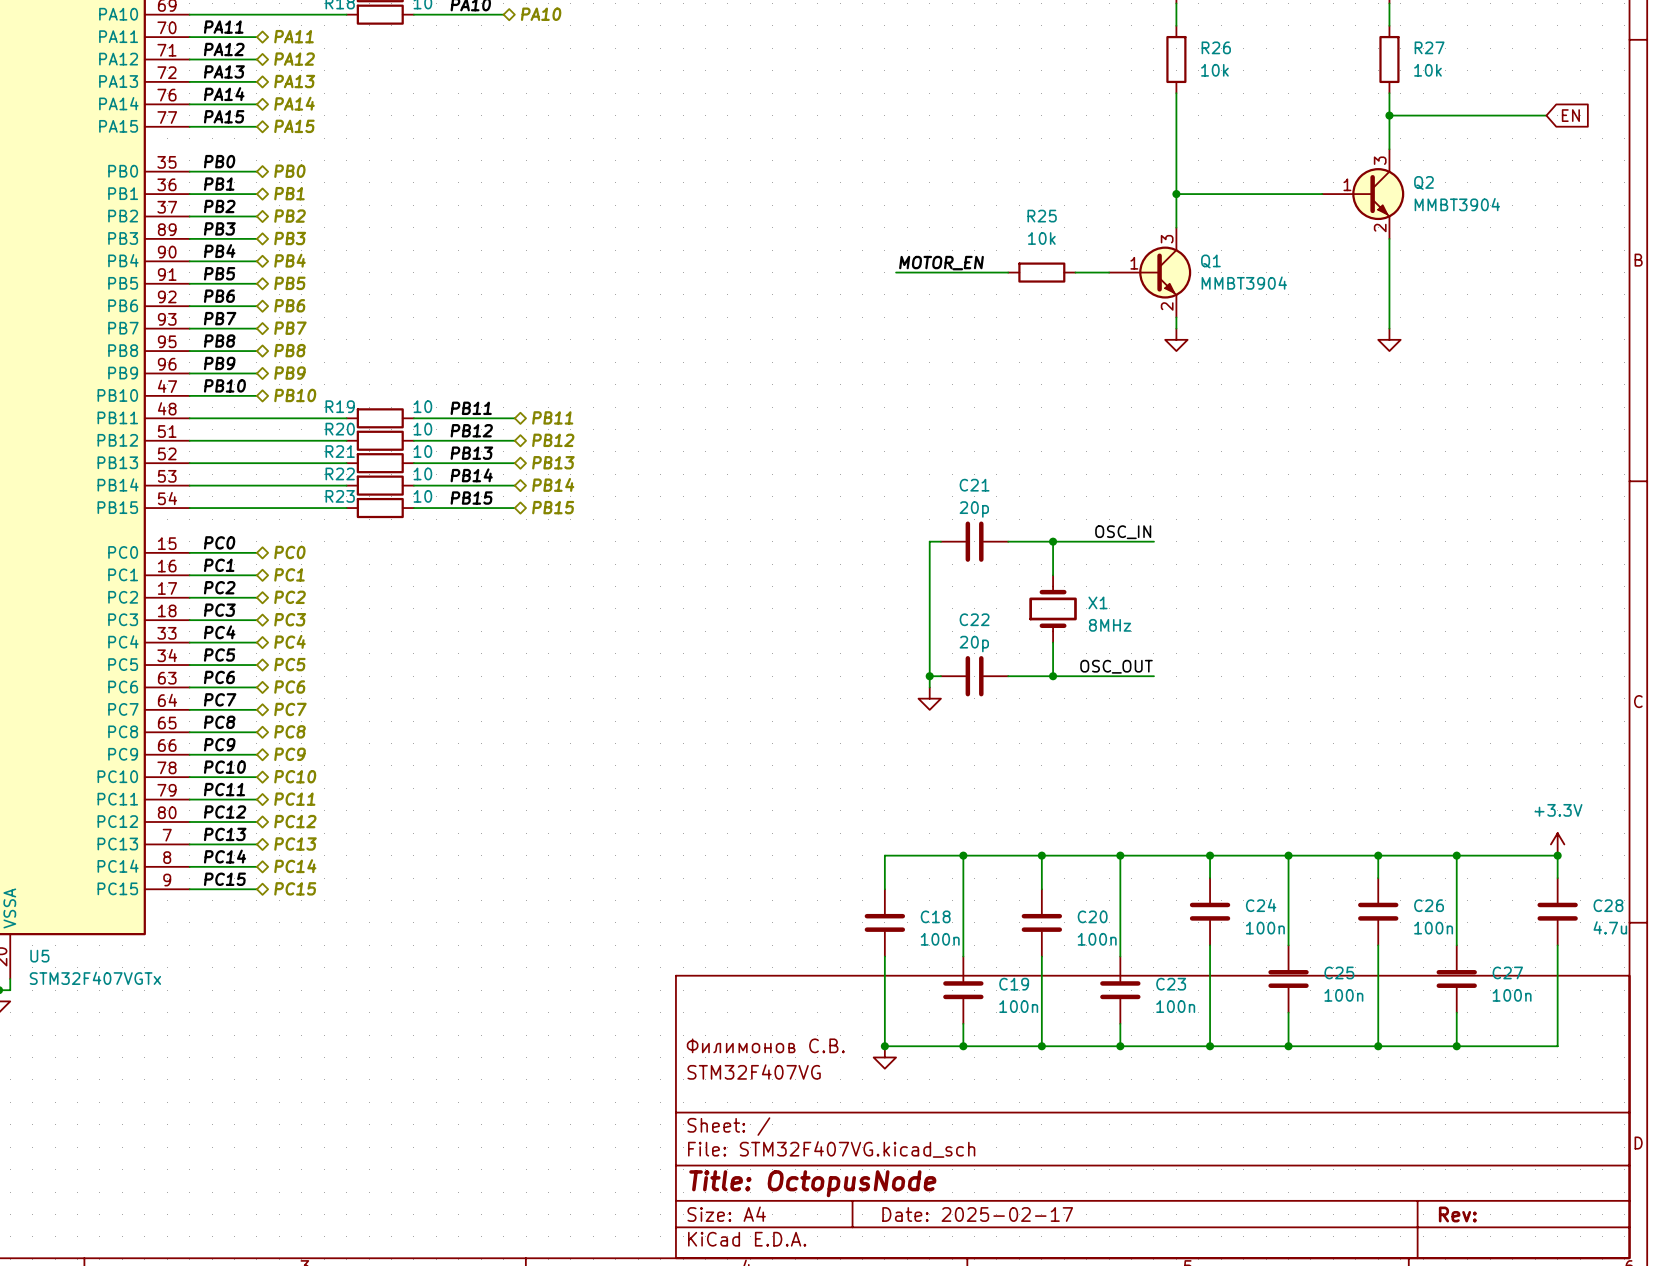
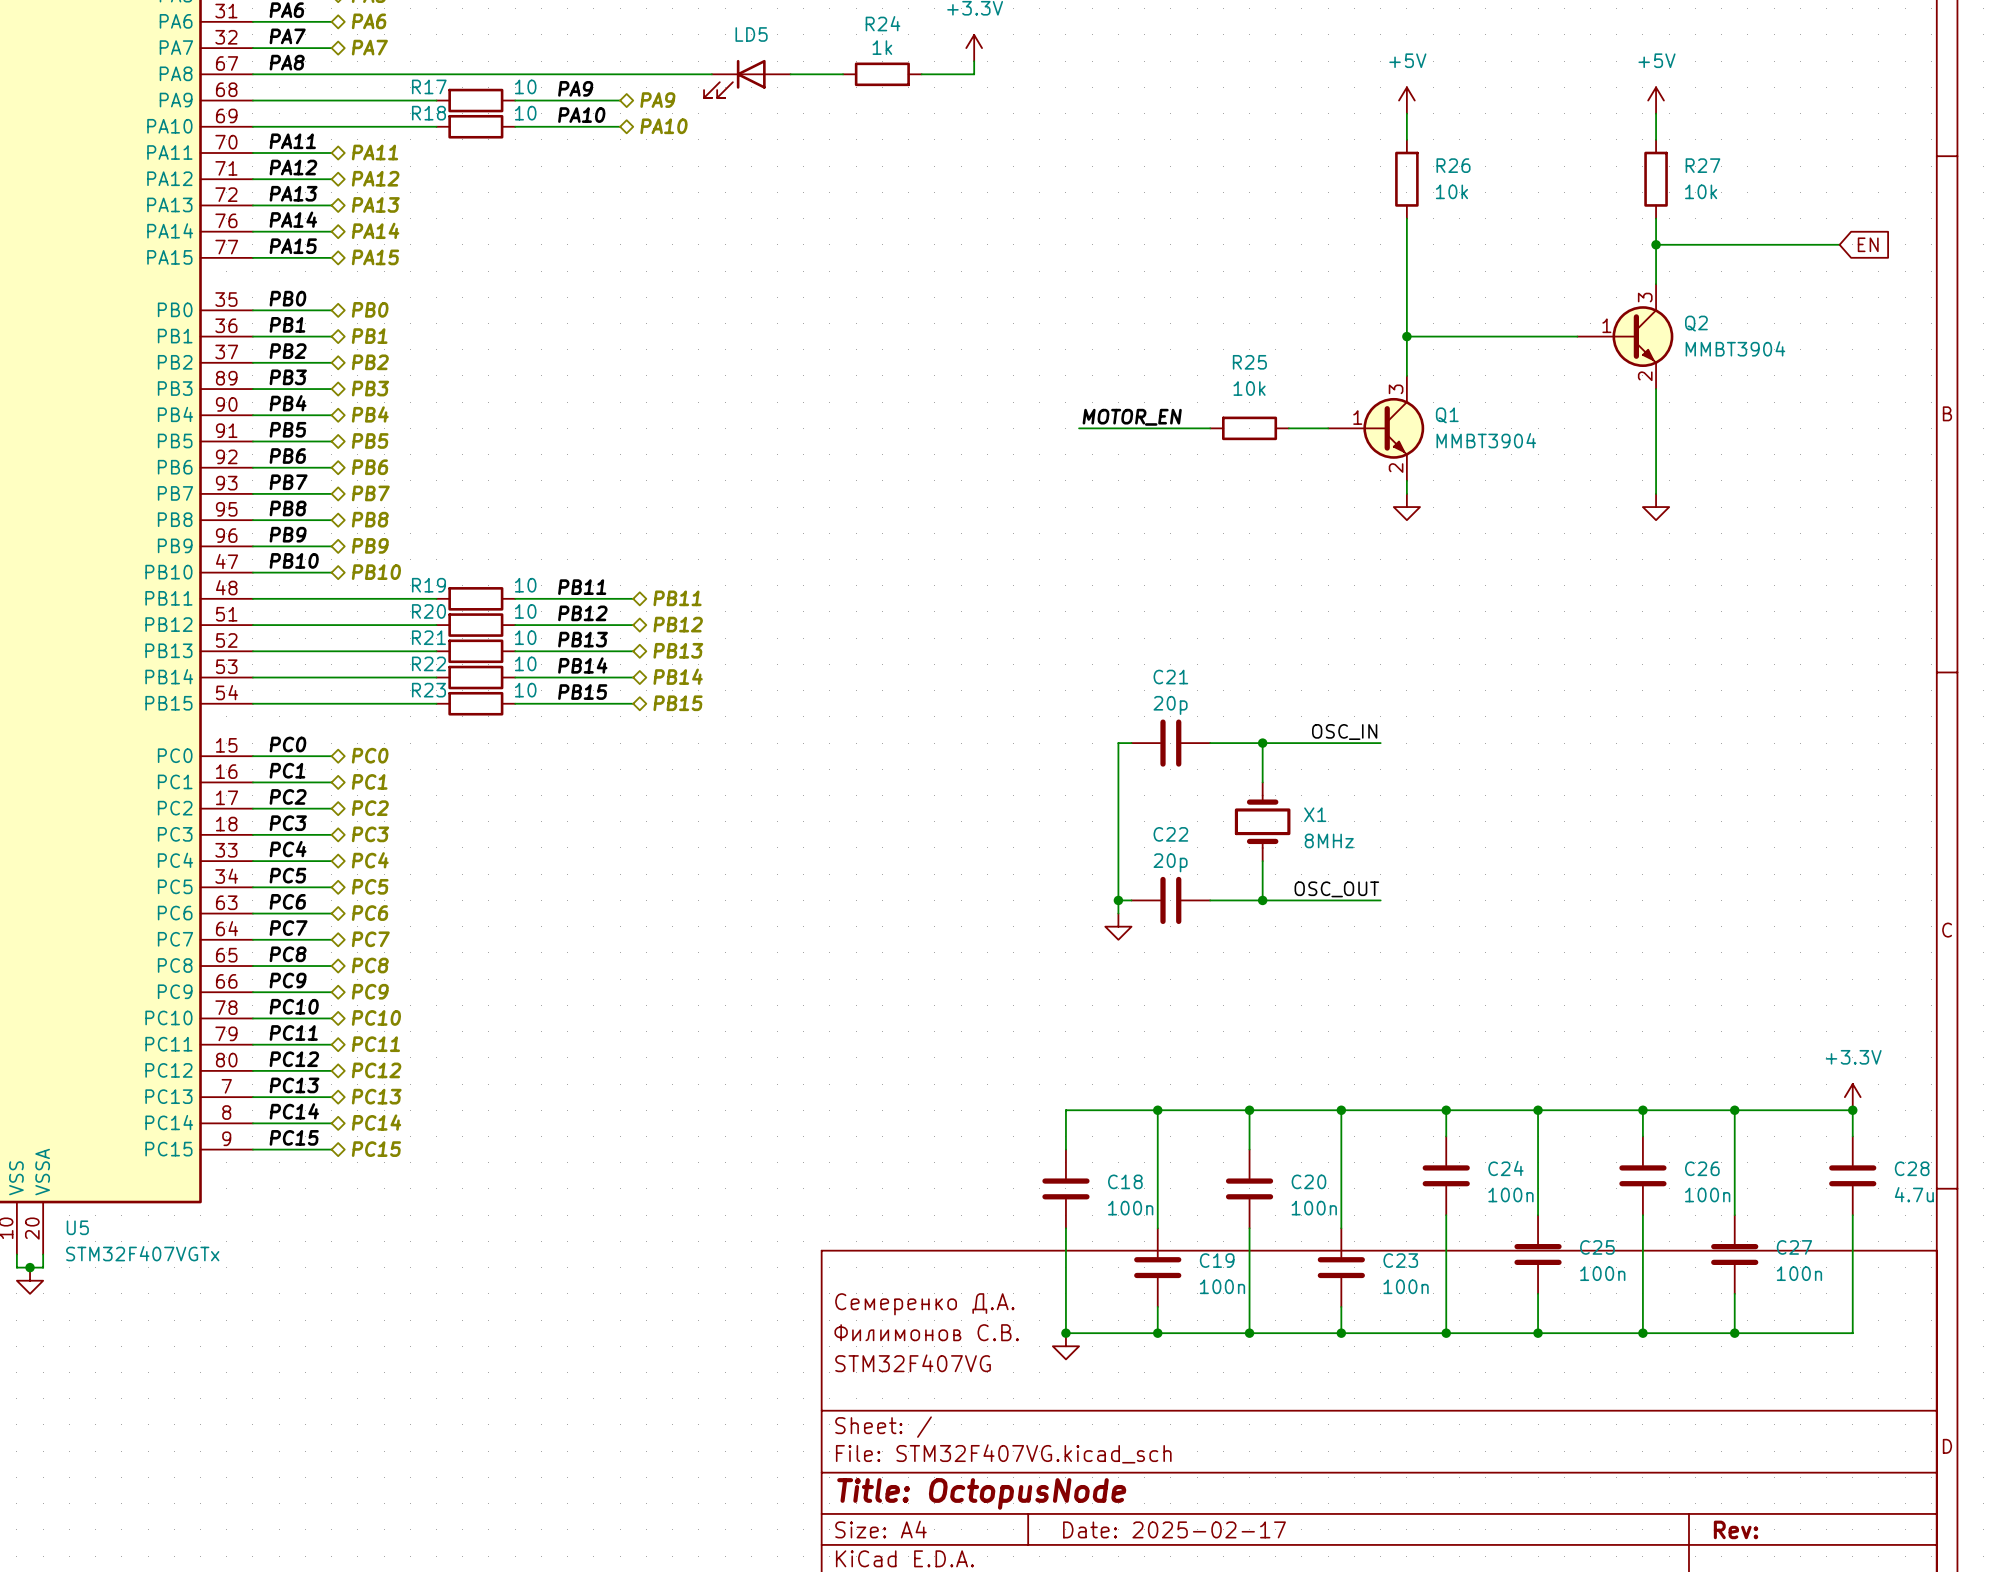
title block: none -> Семеренко Д.А. (924, 1304)

